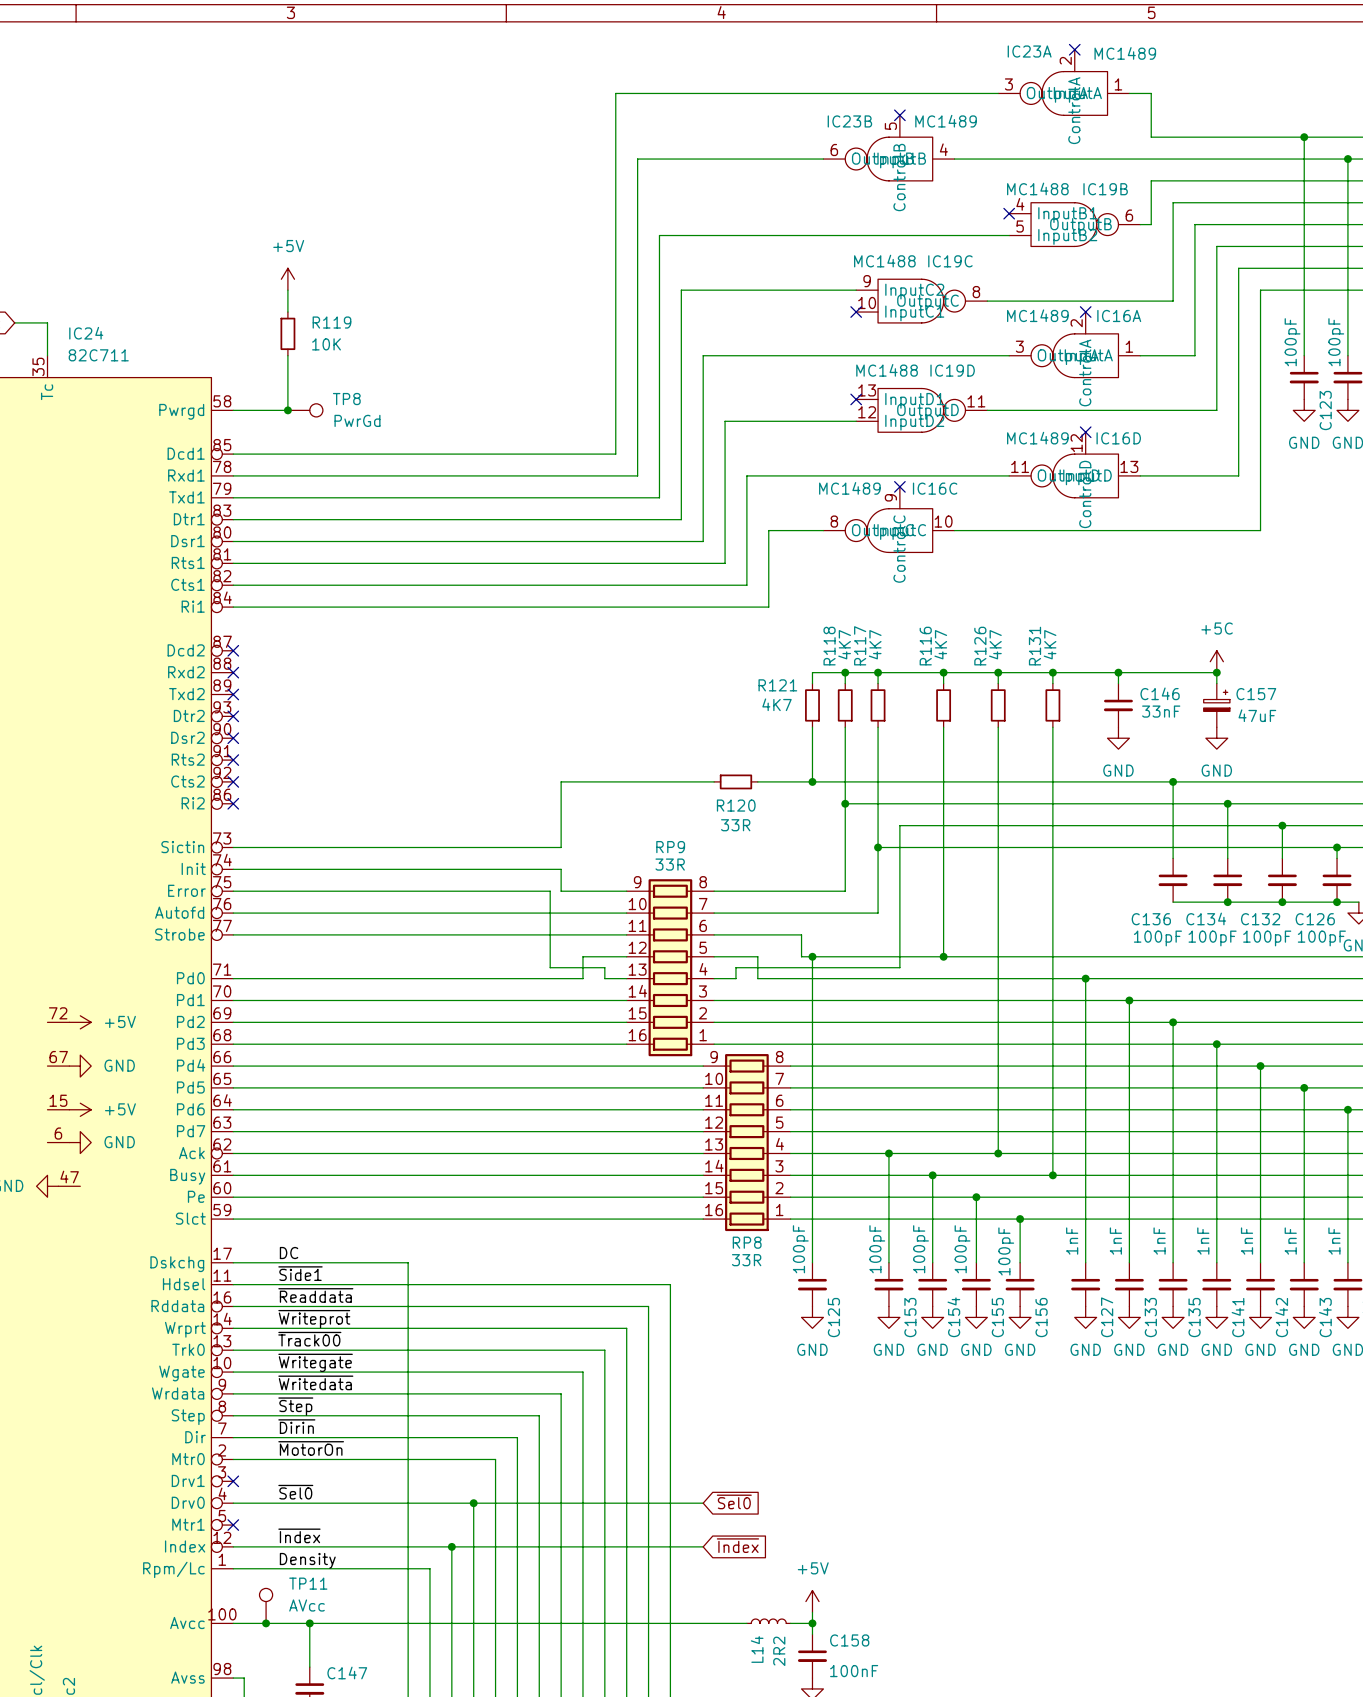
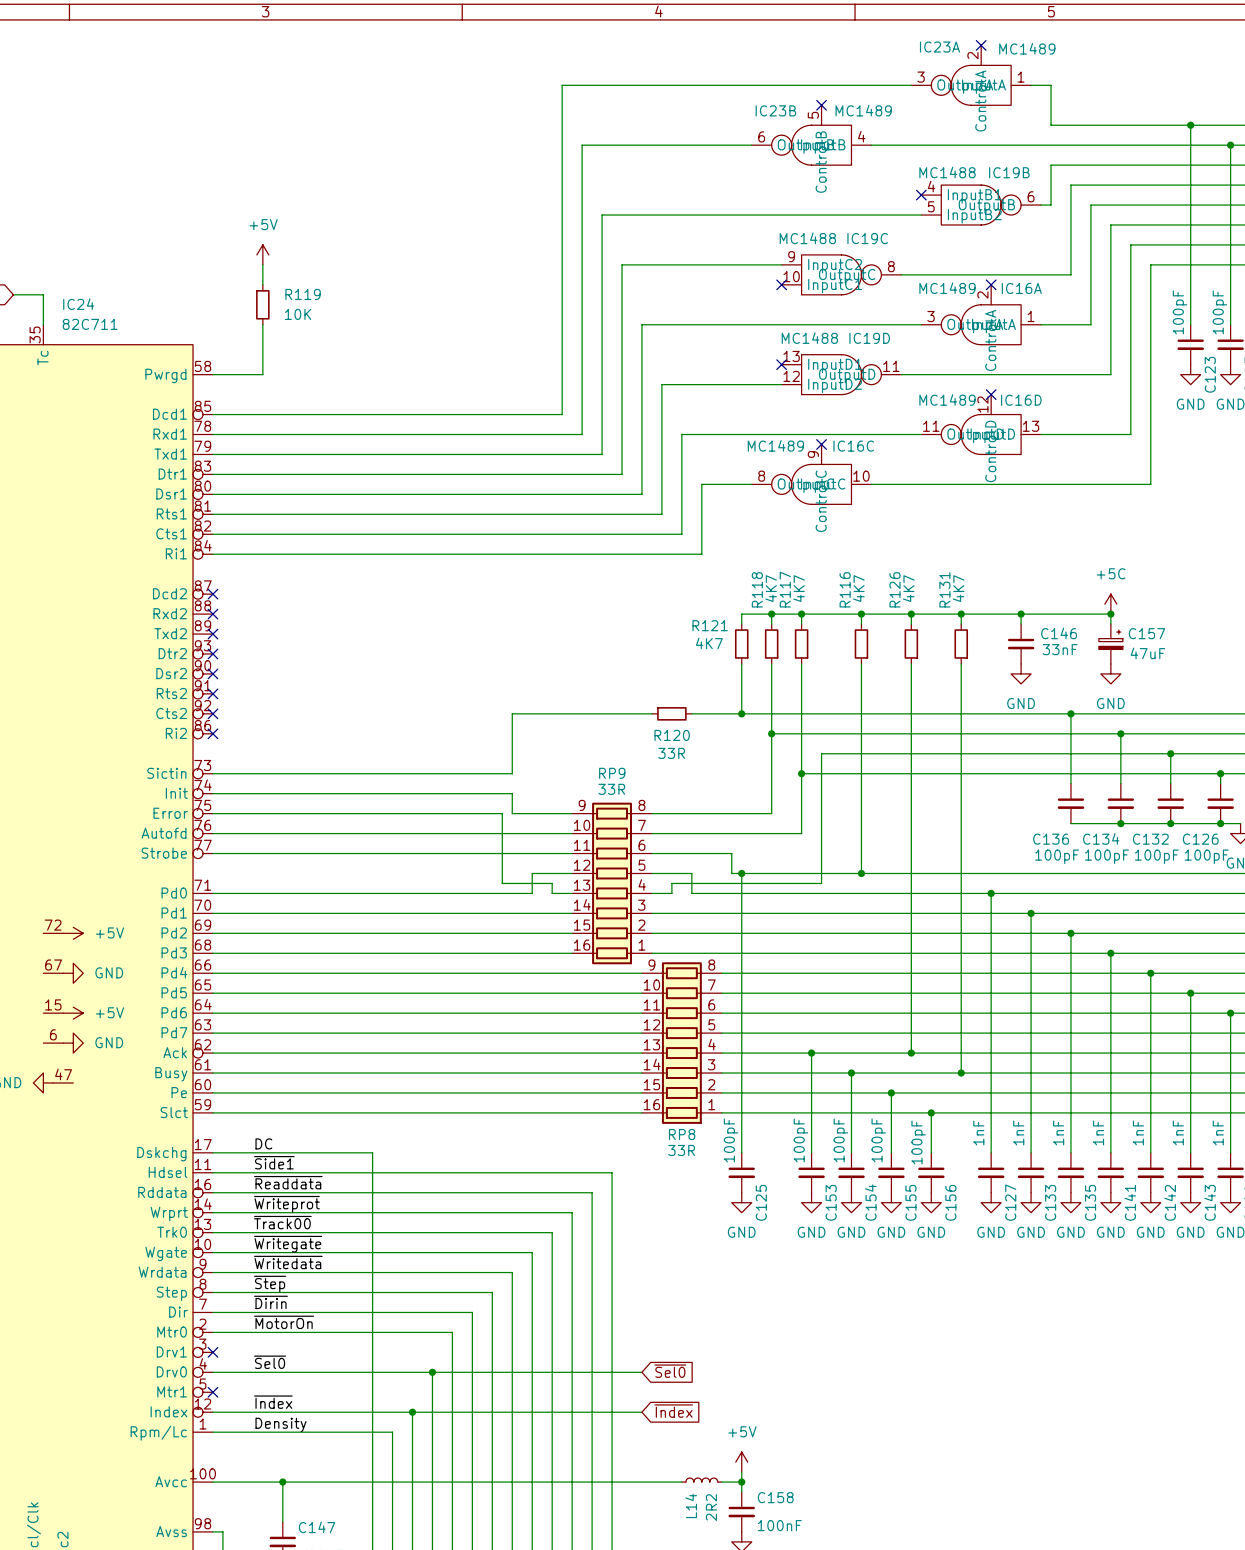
junction: (287, 410) -> none
TP8: PwrGd (305, 410) -> none
TP11: AVcc (266, 1605) -> none
junction: (266, 1623) -> none

